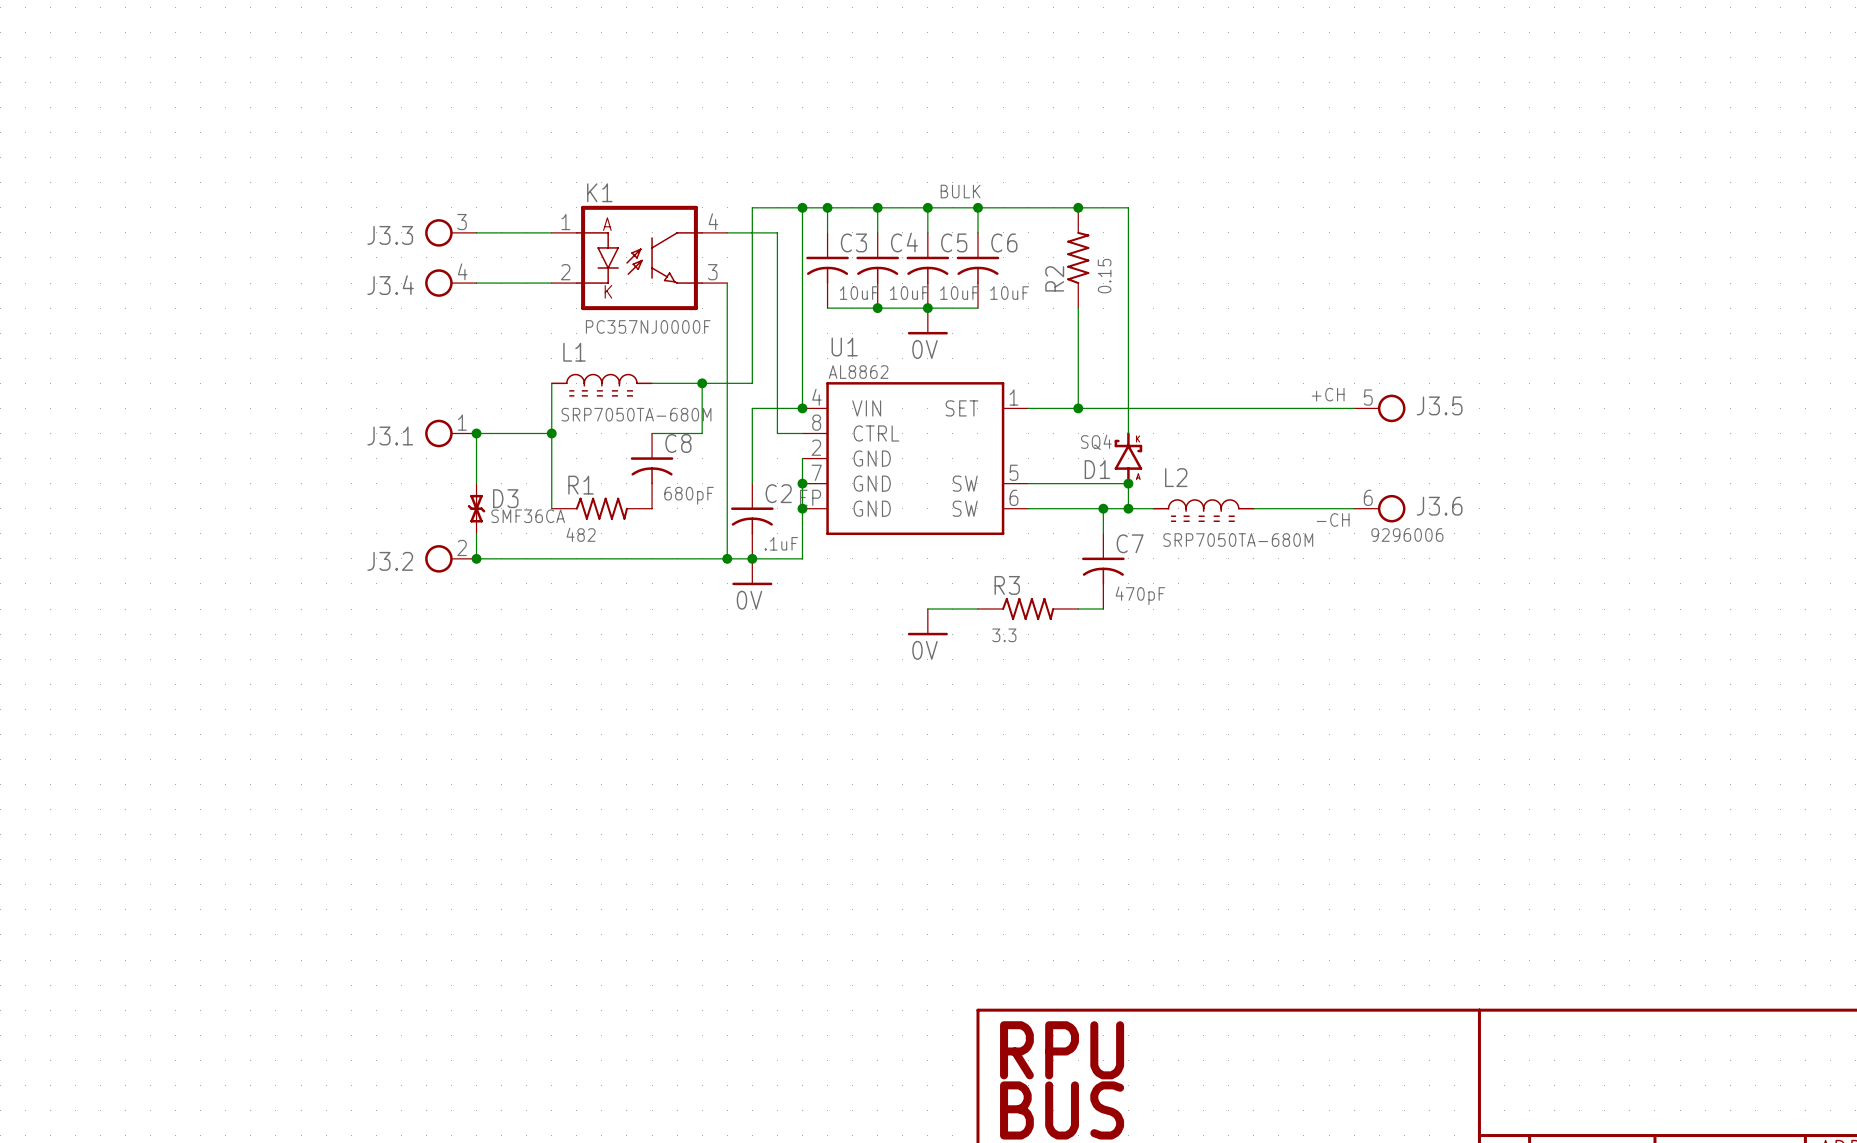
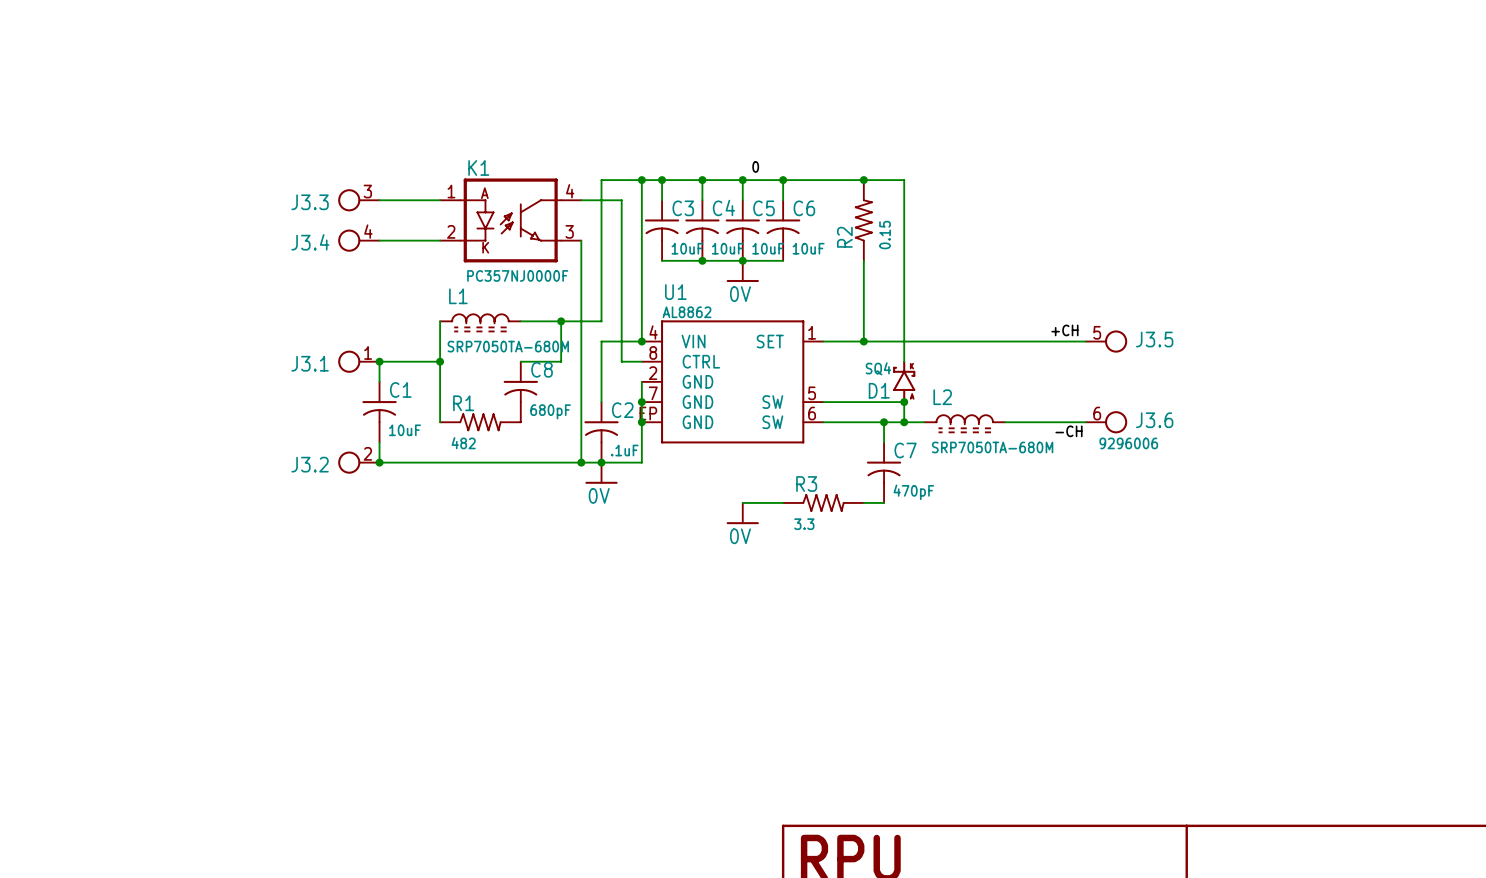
label: BULK (960, 191) -> 0 (755, 166)
C1: none -> 10uF (379, 412)
D3: SMF36CA (476, 508) -> none

